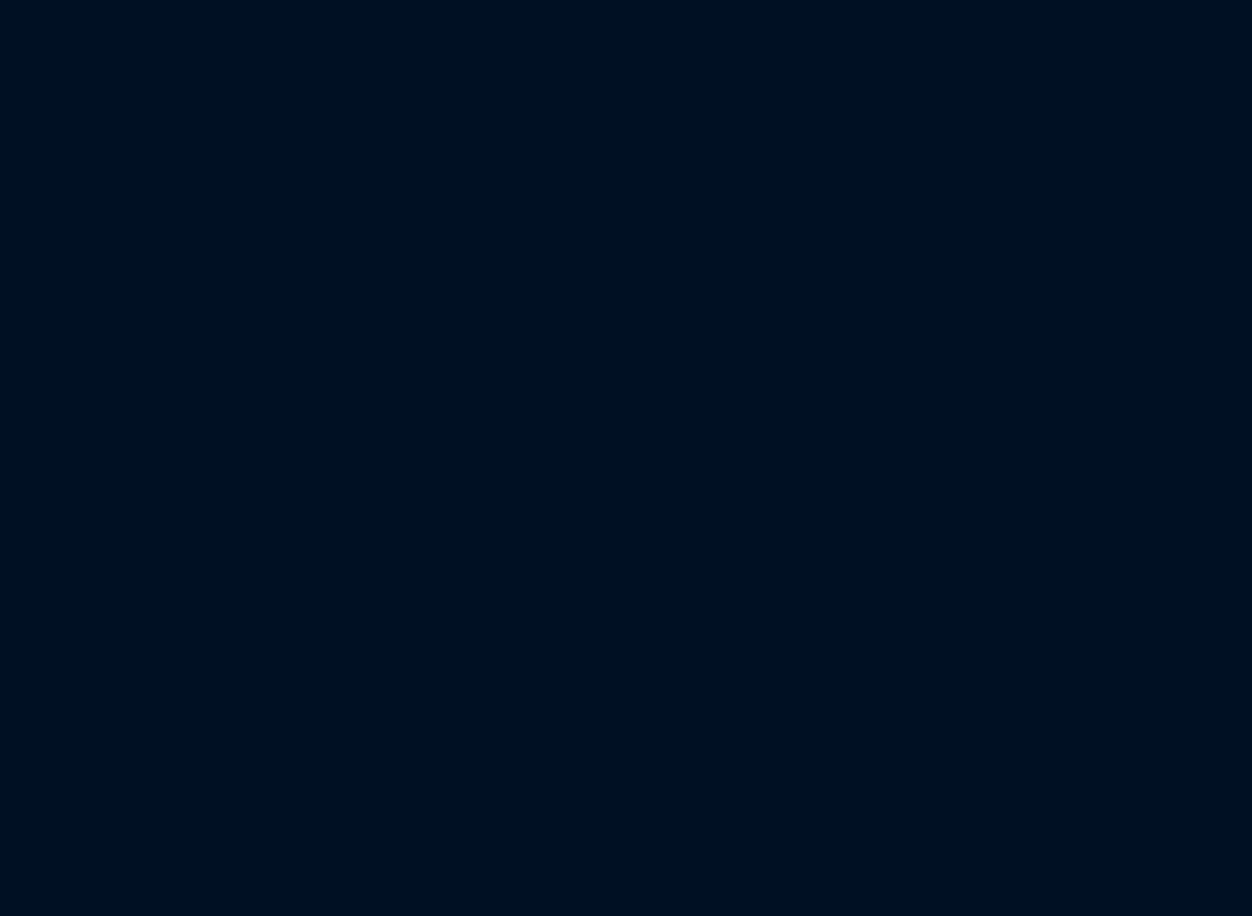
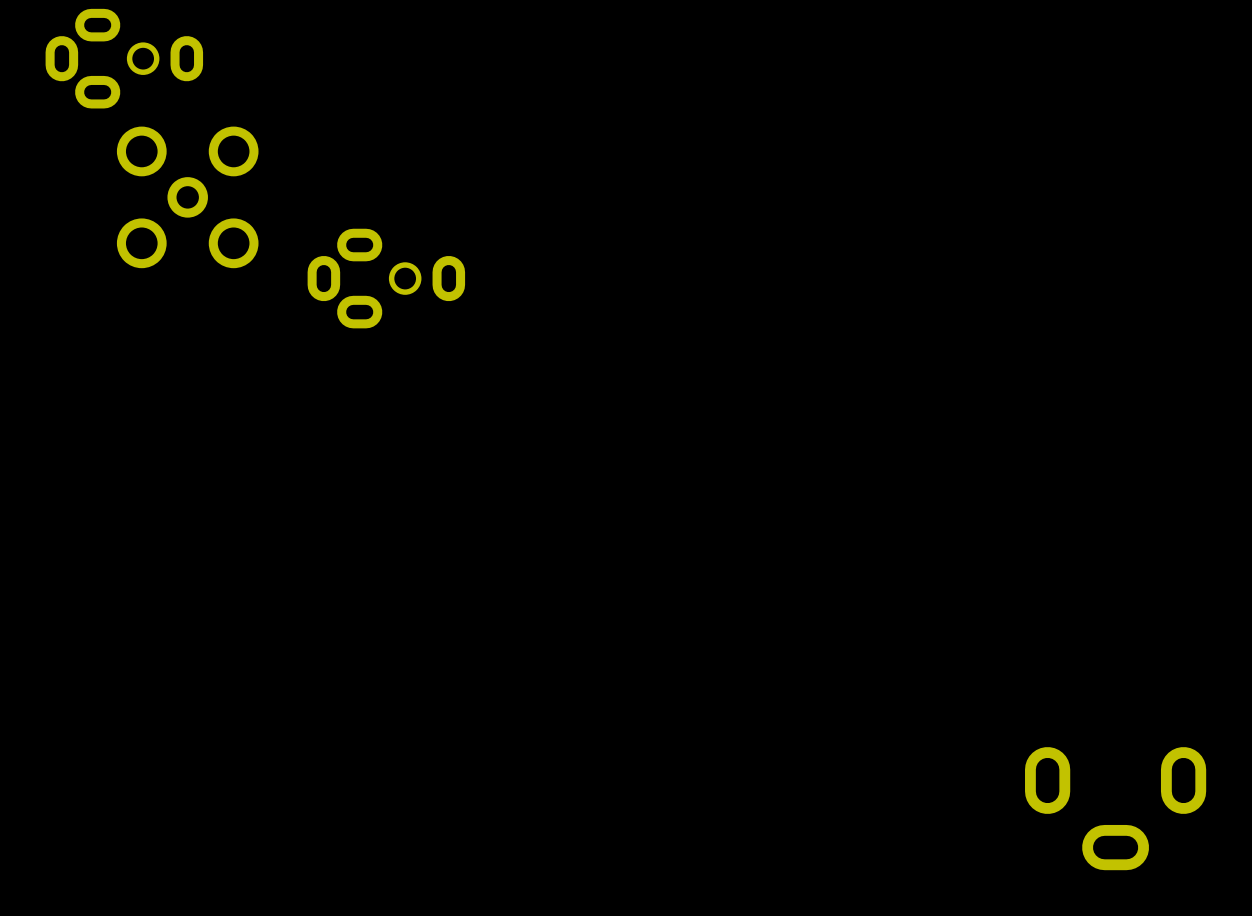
part: none -> (124, 58)
part: none -> (187, 197)
part: none -> (386, 278)
part: none -> (1115, 808)

